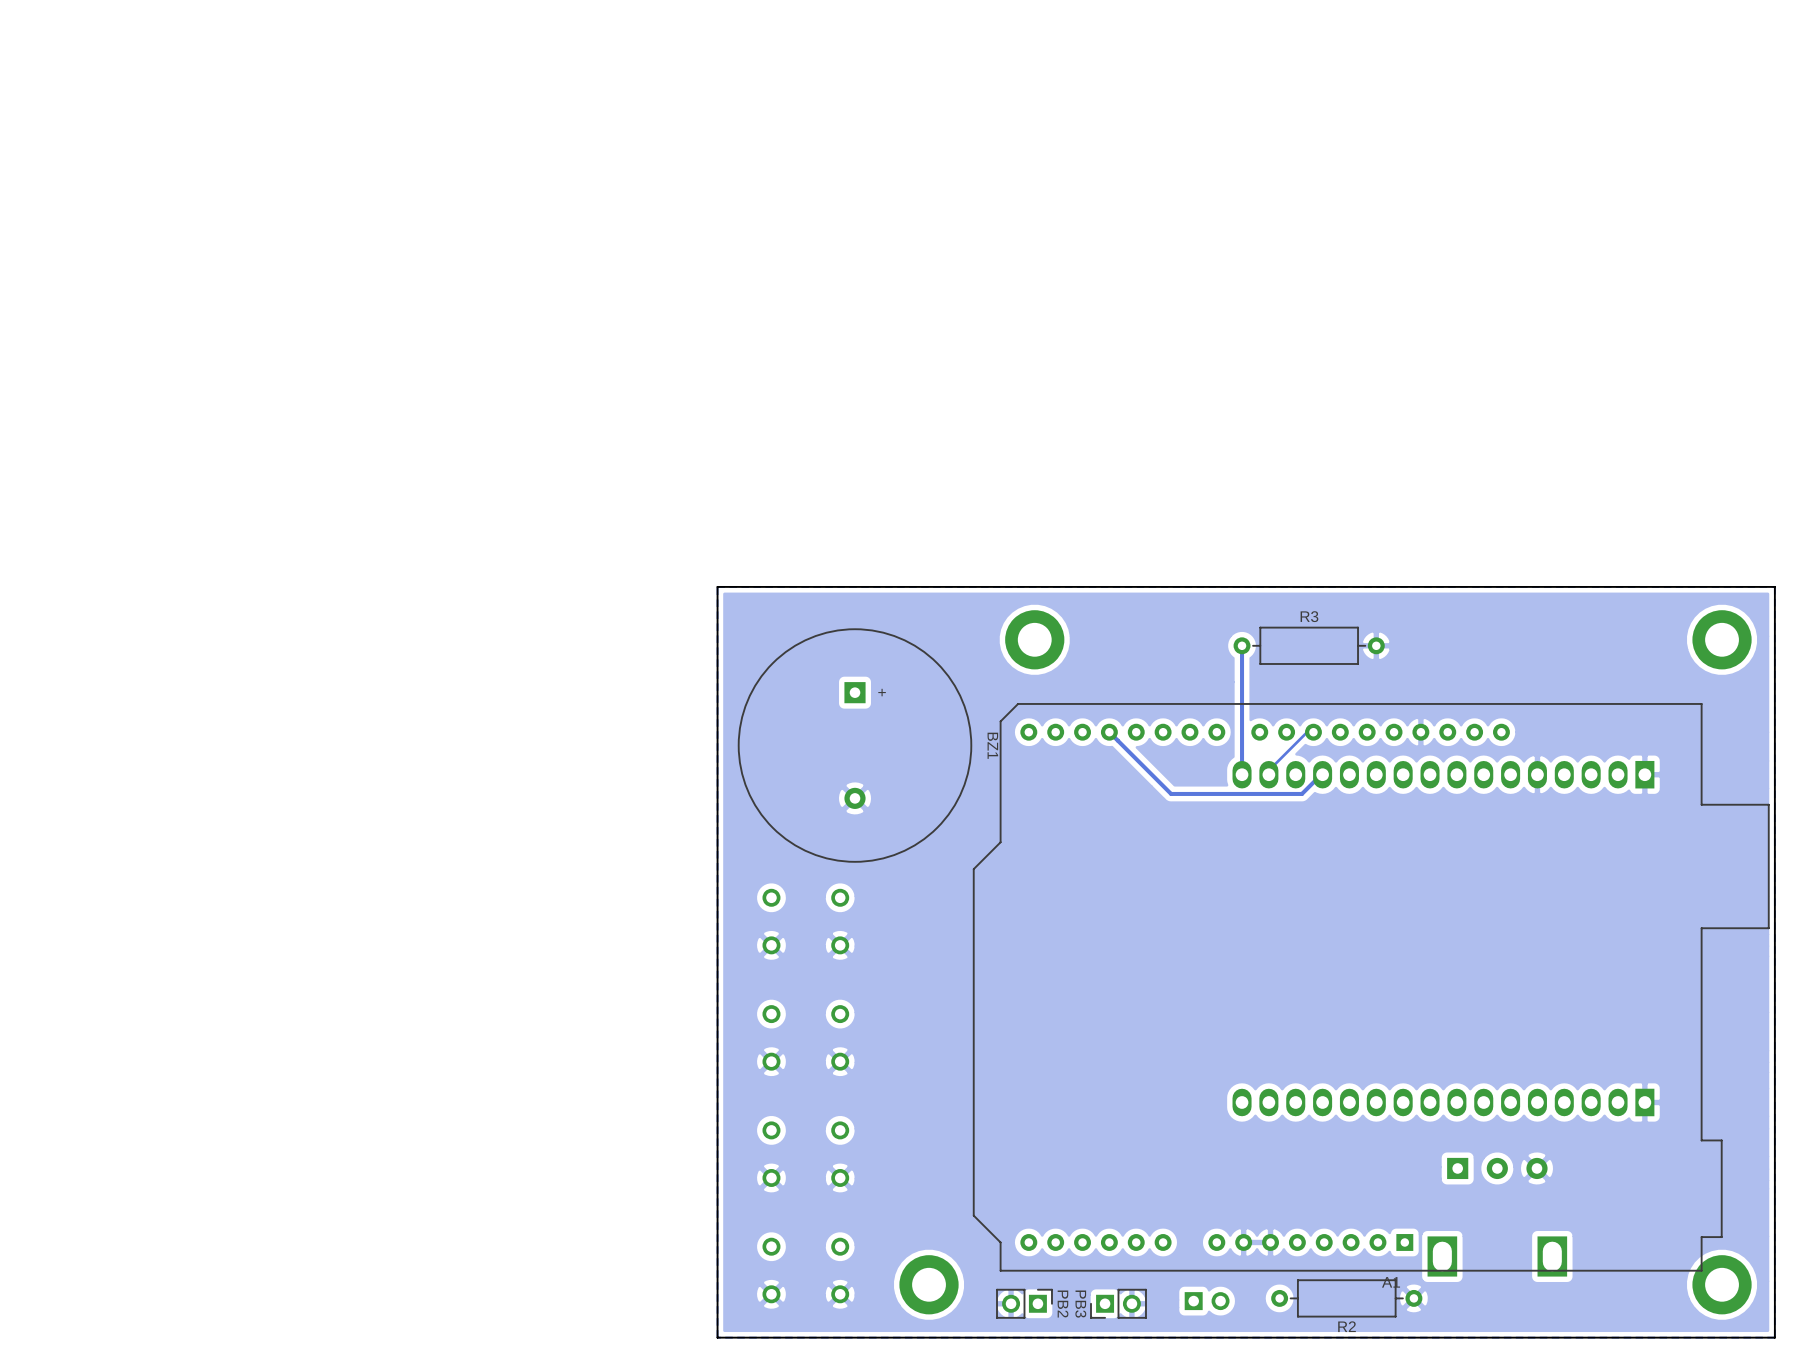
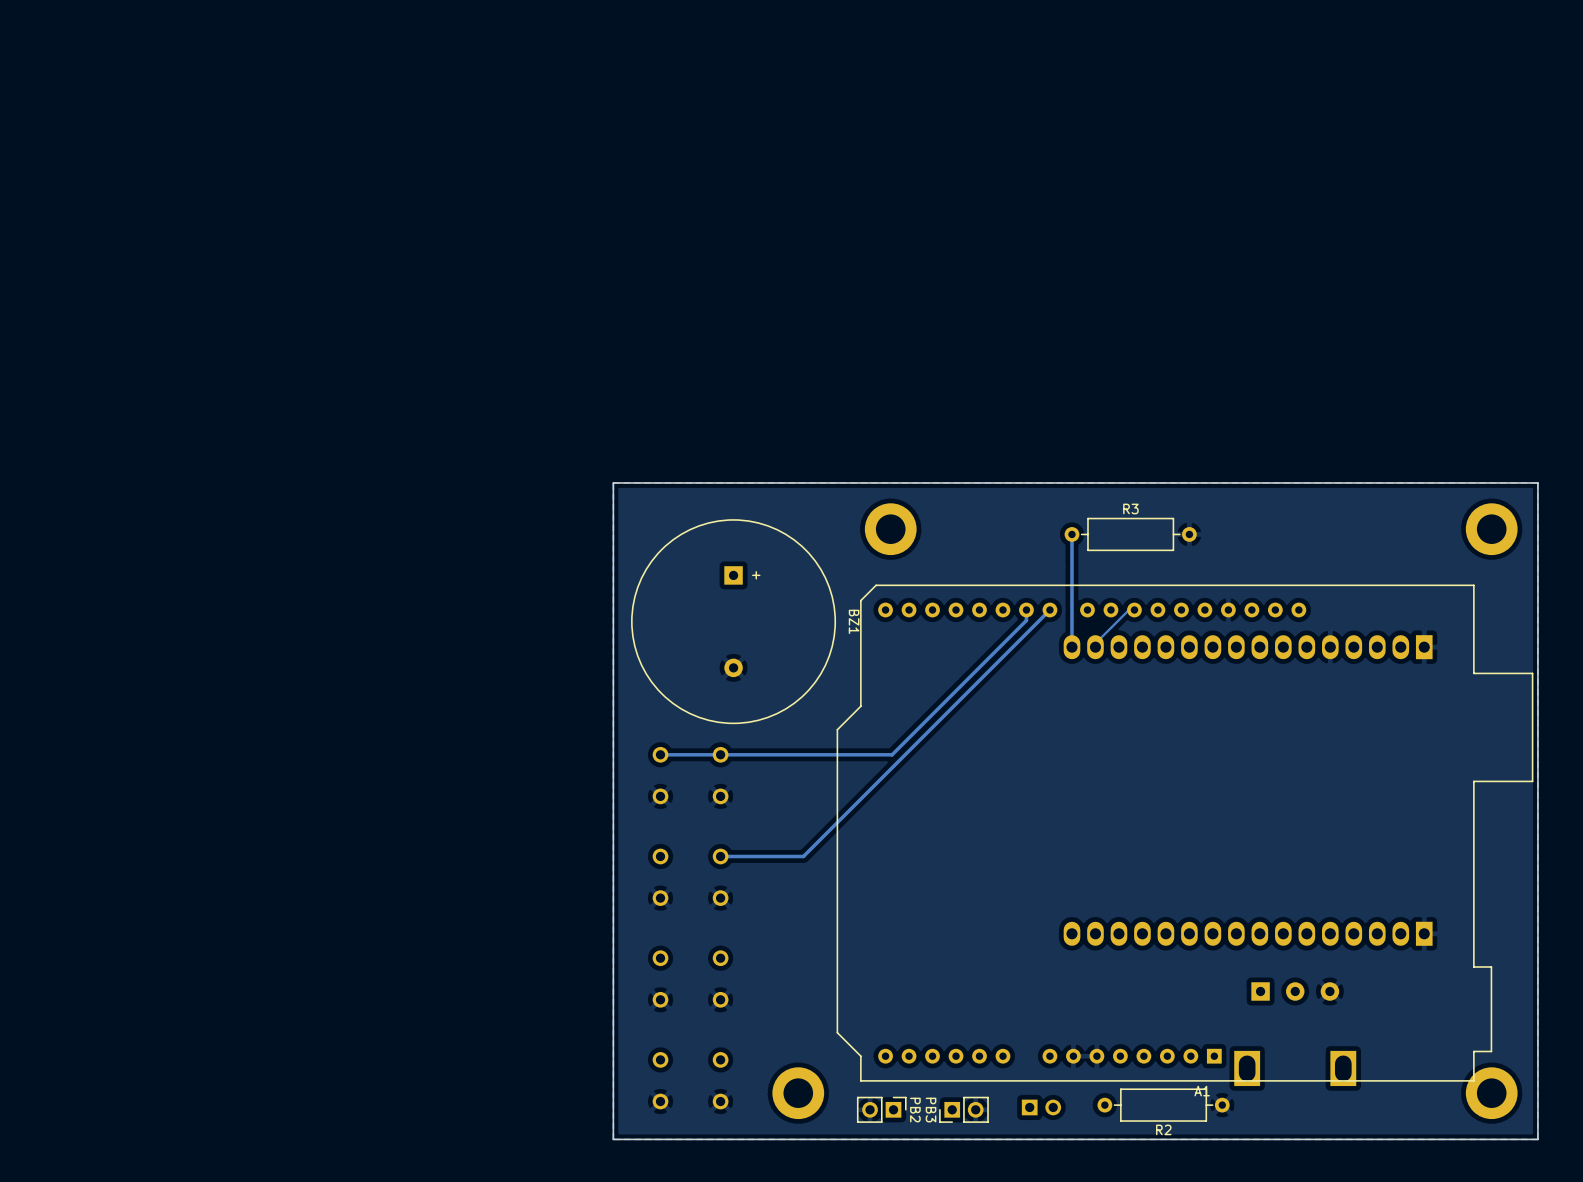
track: (1109, 732) (1171, 793) (1301, 793) (1322, 774) -> none
track: none -> (1026, 610) (1026, 620) (892, 754) (660, 754)
track: none -> (1049, 610) (803, 856) (720, 856)

